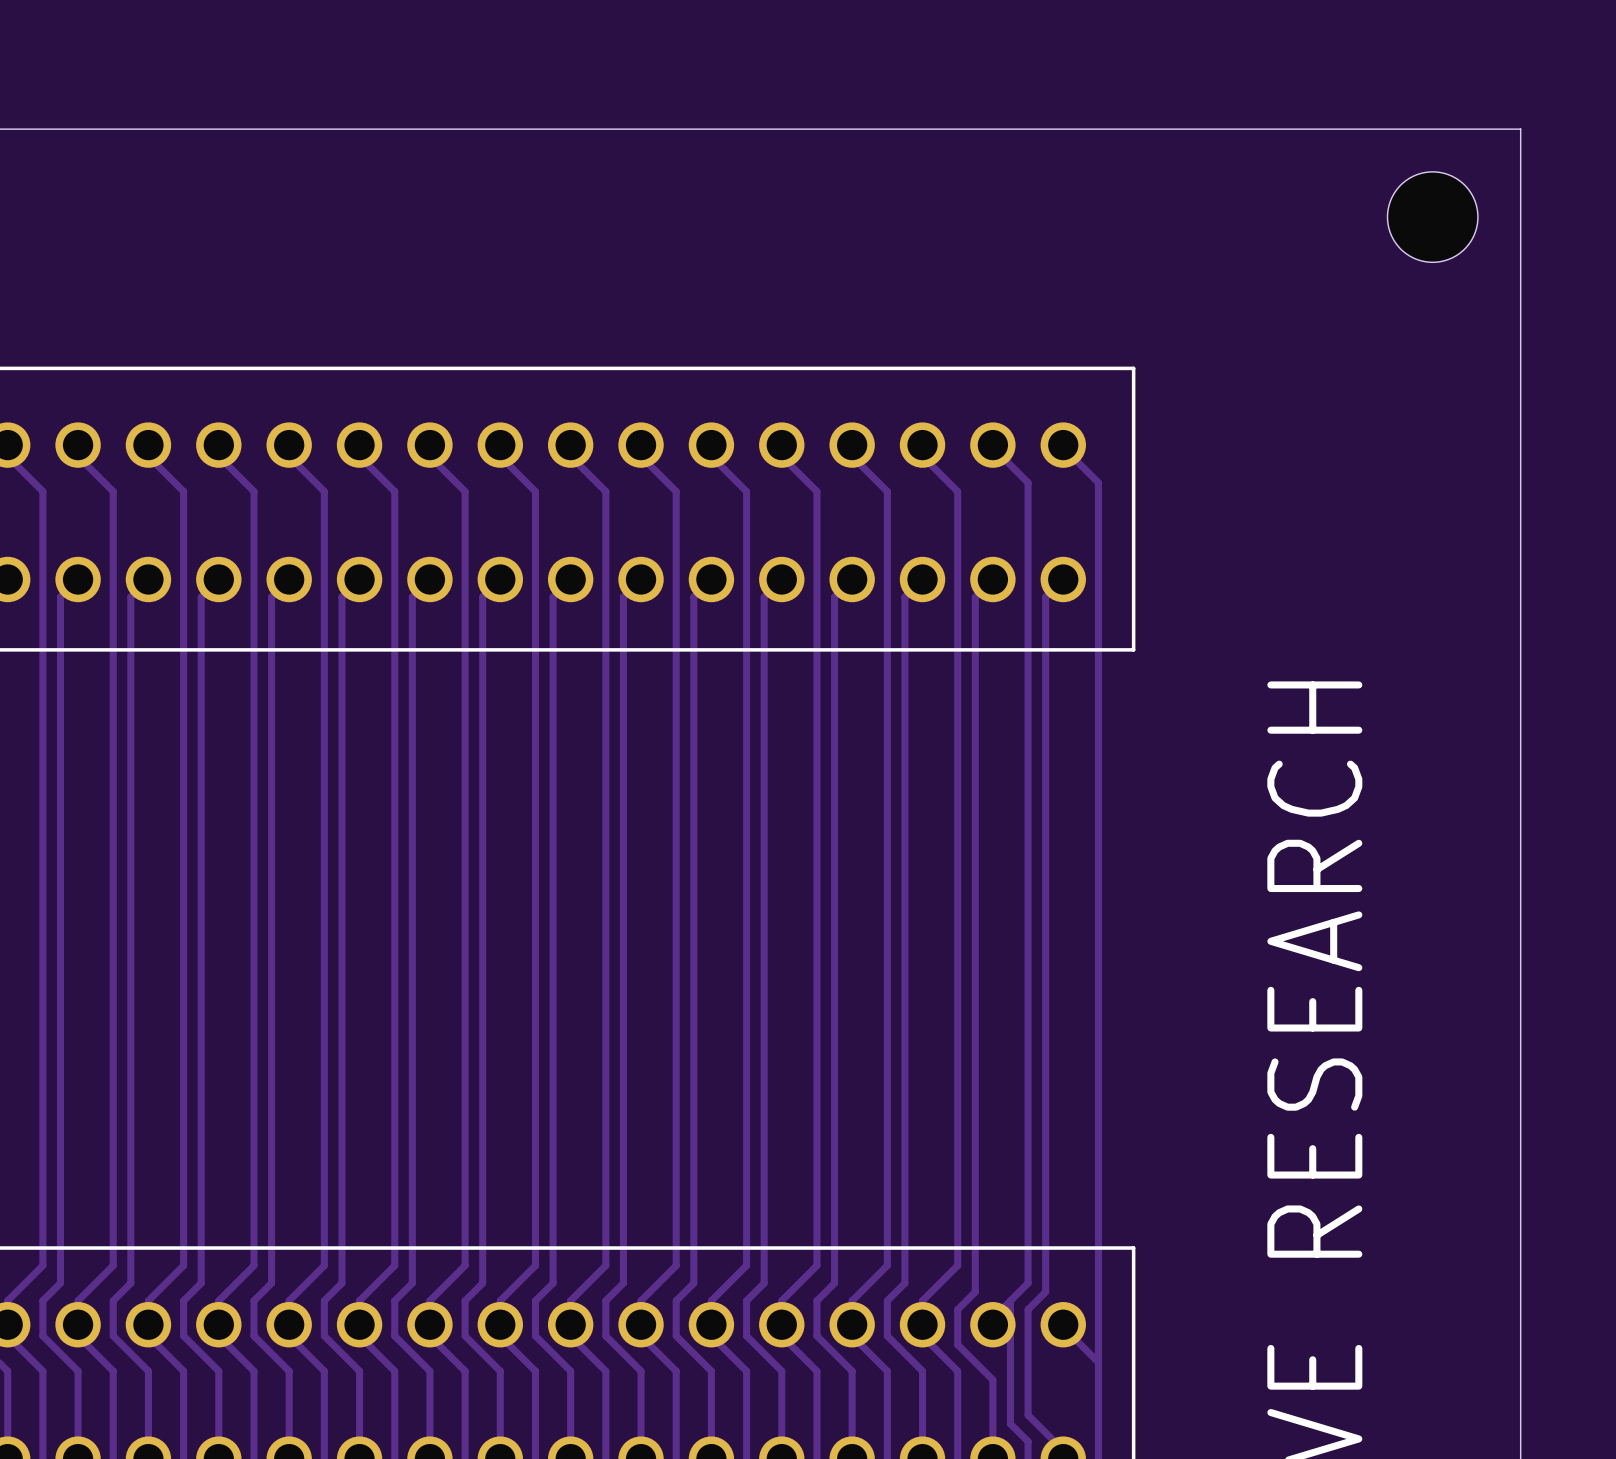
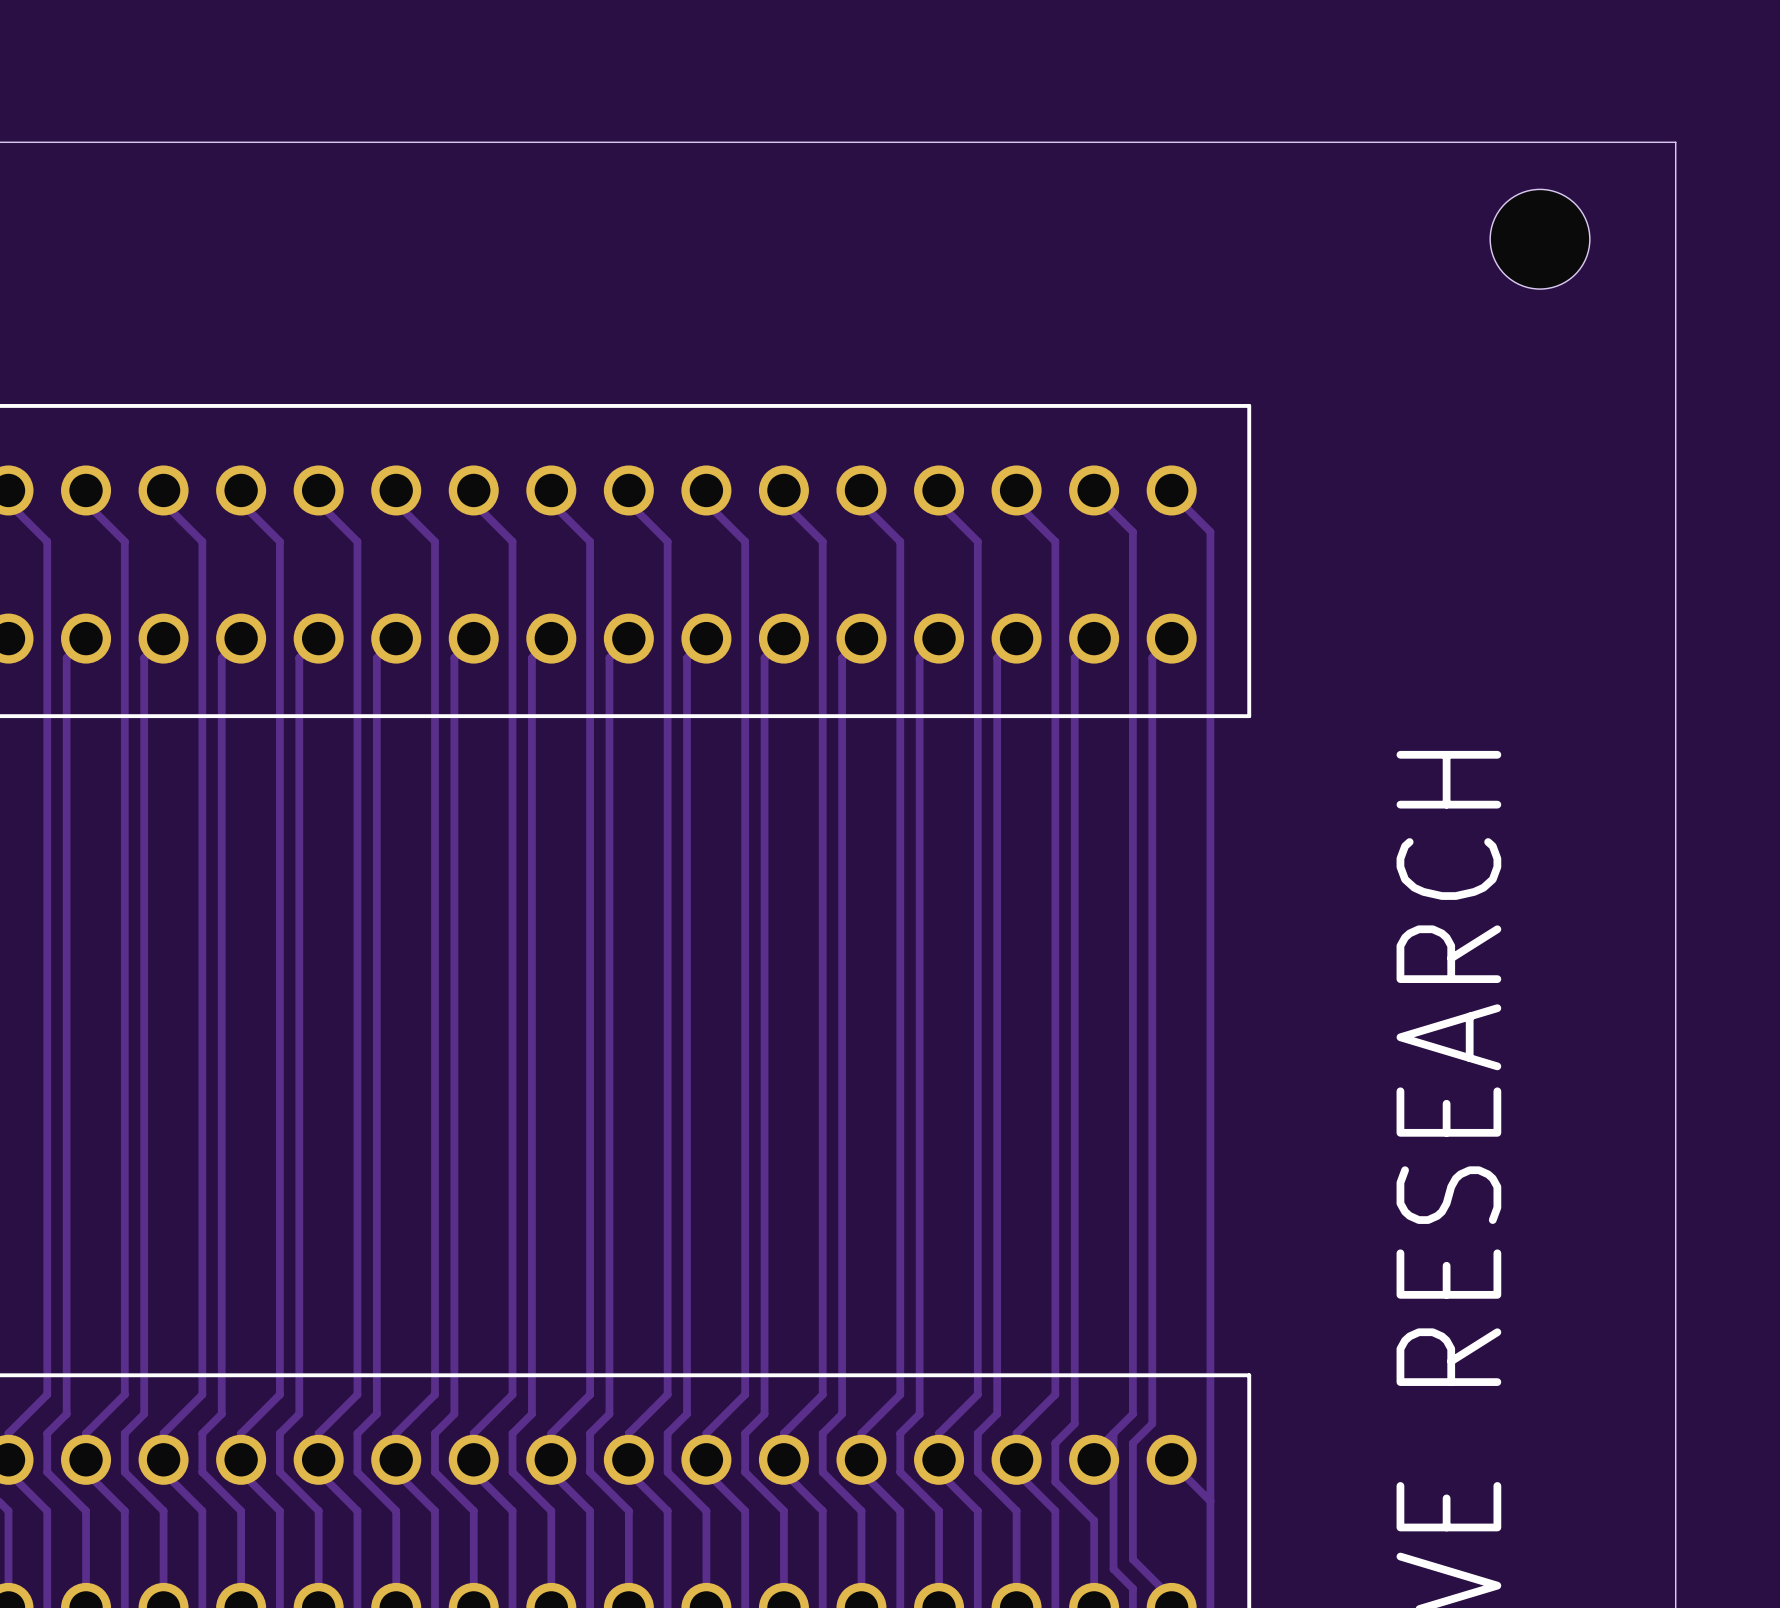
hole position: (1432, 217) -> (1540, 239)

